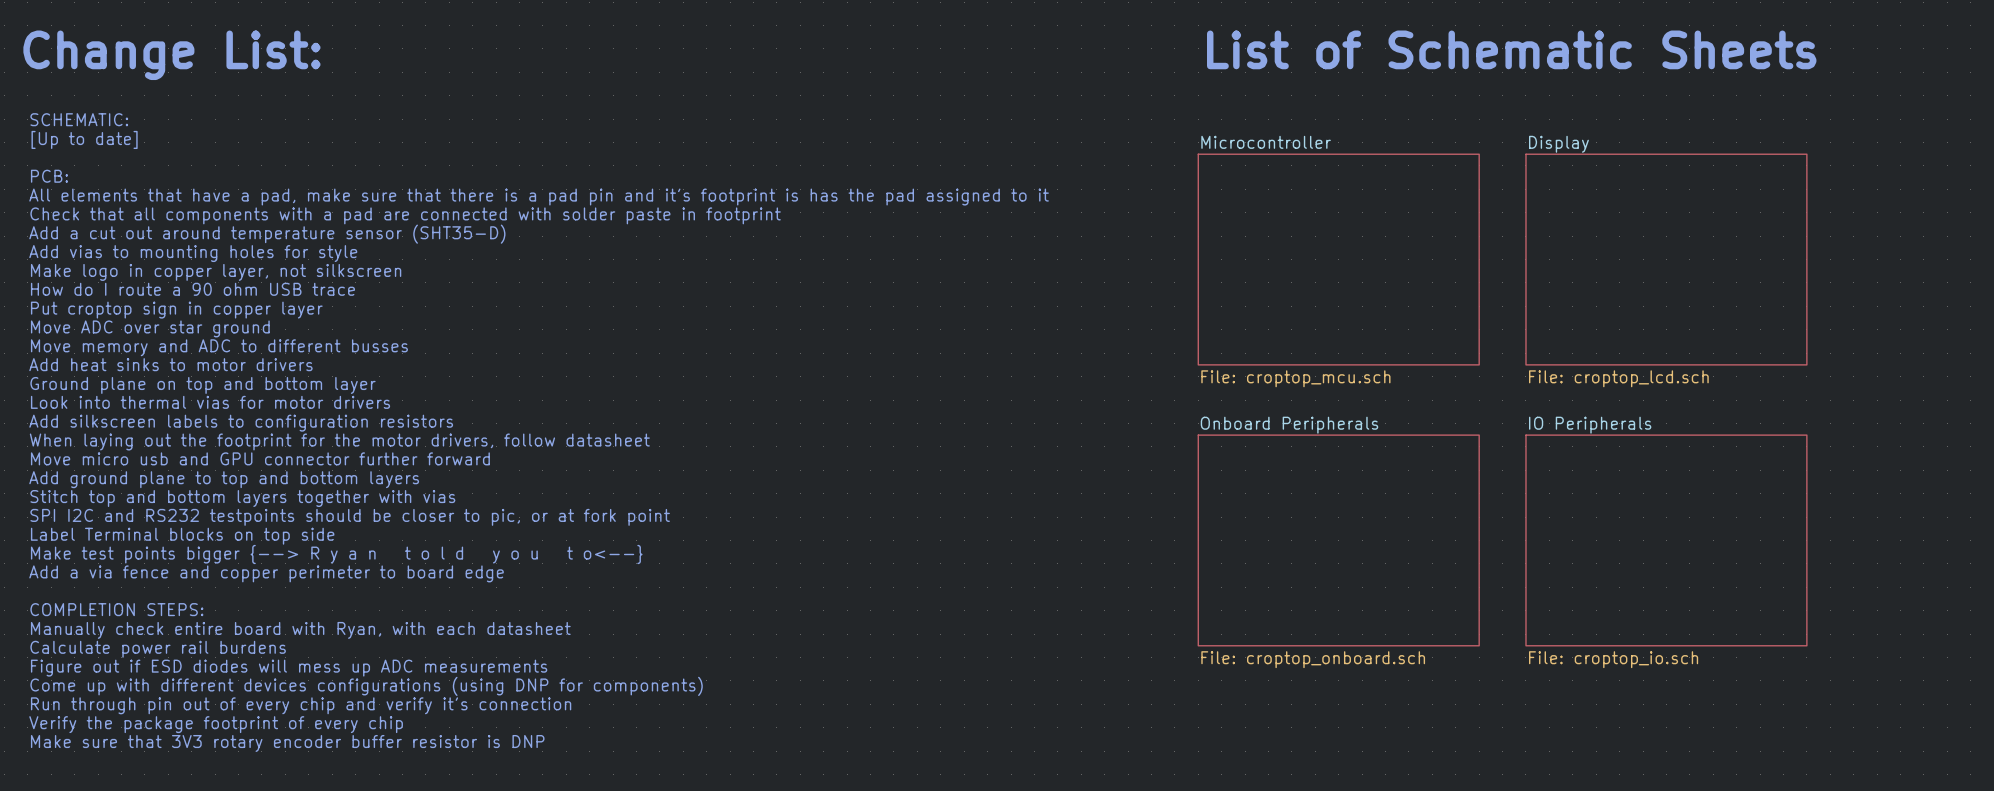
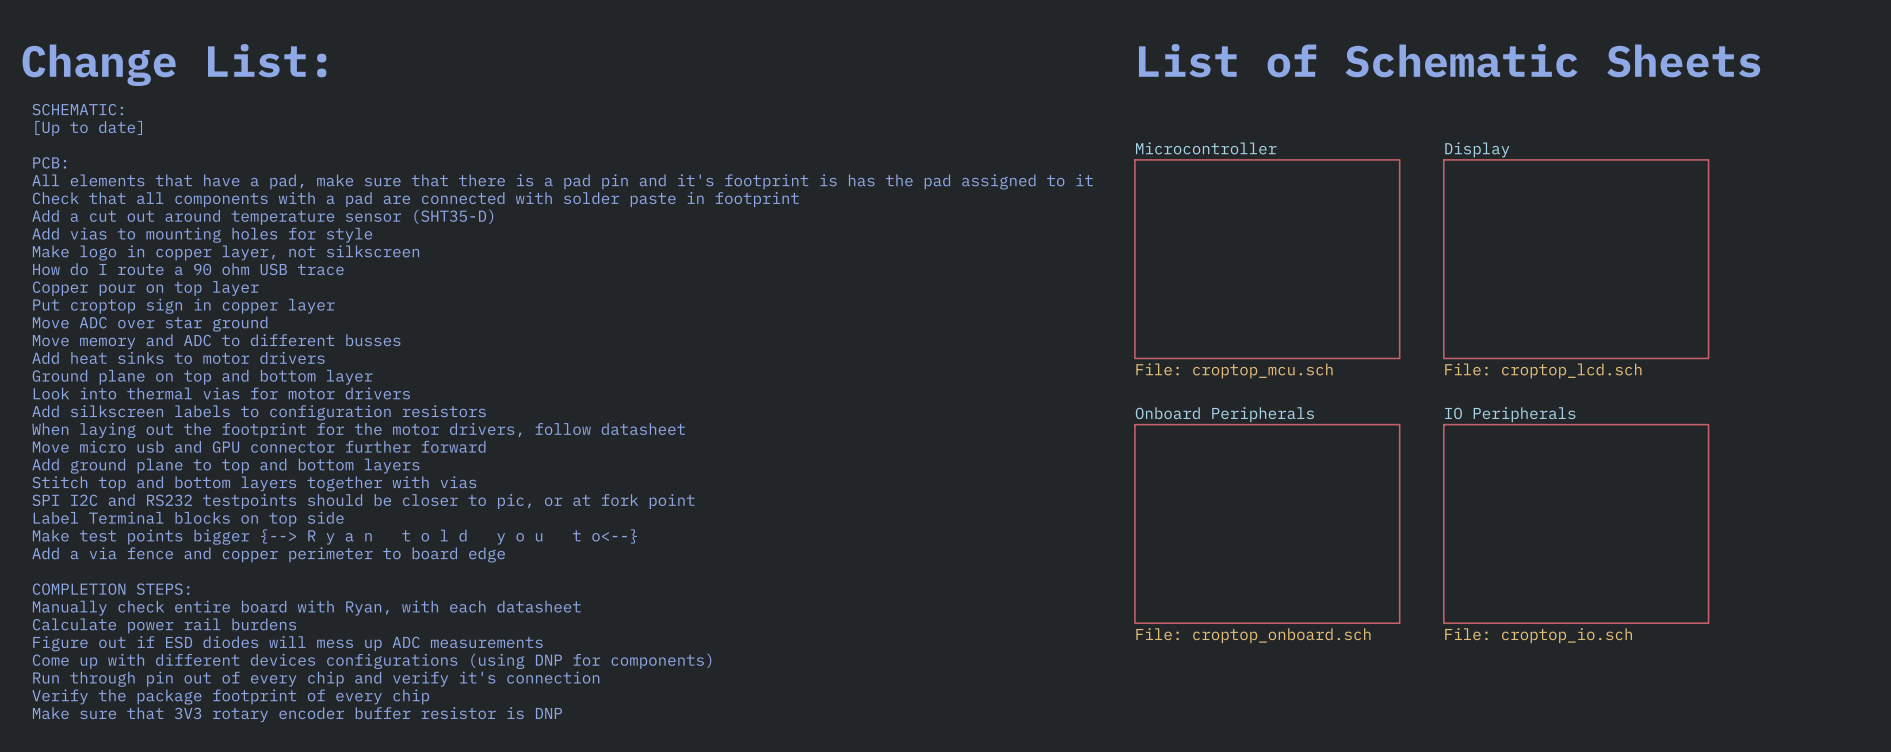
text: none -> SCHEMATIC: (77, 109)
text: SCHEMATIC: (79, 119) -> [Up to date] (88, 128)
text: [Up to date] (84, 139) -> none
text: none -> PCB: (49, 162)
text: PCB: (49, 176) -> All elements that have a pad, make sure that there is a pad pin and it's footprint is has the pad assigned to it (562, 181)
text: All elements that have a pad, make sure that there is a pad pin and it's footprint is has the pad assigned to it (539, 197) -> Check that all components with a pad are connected with solder paste in footprint (415, 199)
text: Check that all components with a pad are connected with solder paste in footprint (405, 215) -> Add a cut out around temperature sensor (SHT35-D) (262, 217)
text: Add a cut out around temperature sensor (SHT35-D) (267, 234) -> Add vias to mounting holes for style (202, 235)
text: Add vias to mounting holes for style (193, 253) -> Make logo in copper layer, not silkscreen (226, 252)
text: Make logo in copper layer, not silkscreen (216, 272) -> How do I route a 90 ohm USB trace (188, 269)
text: How do I route a 90 ohm USB trace (192, 289) -> Copper pour on top layer (145, 288)

